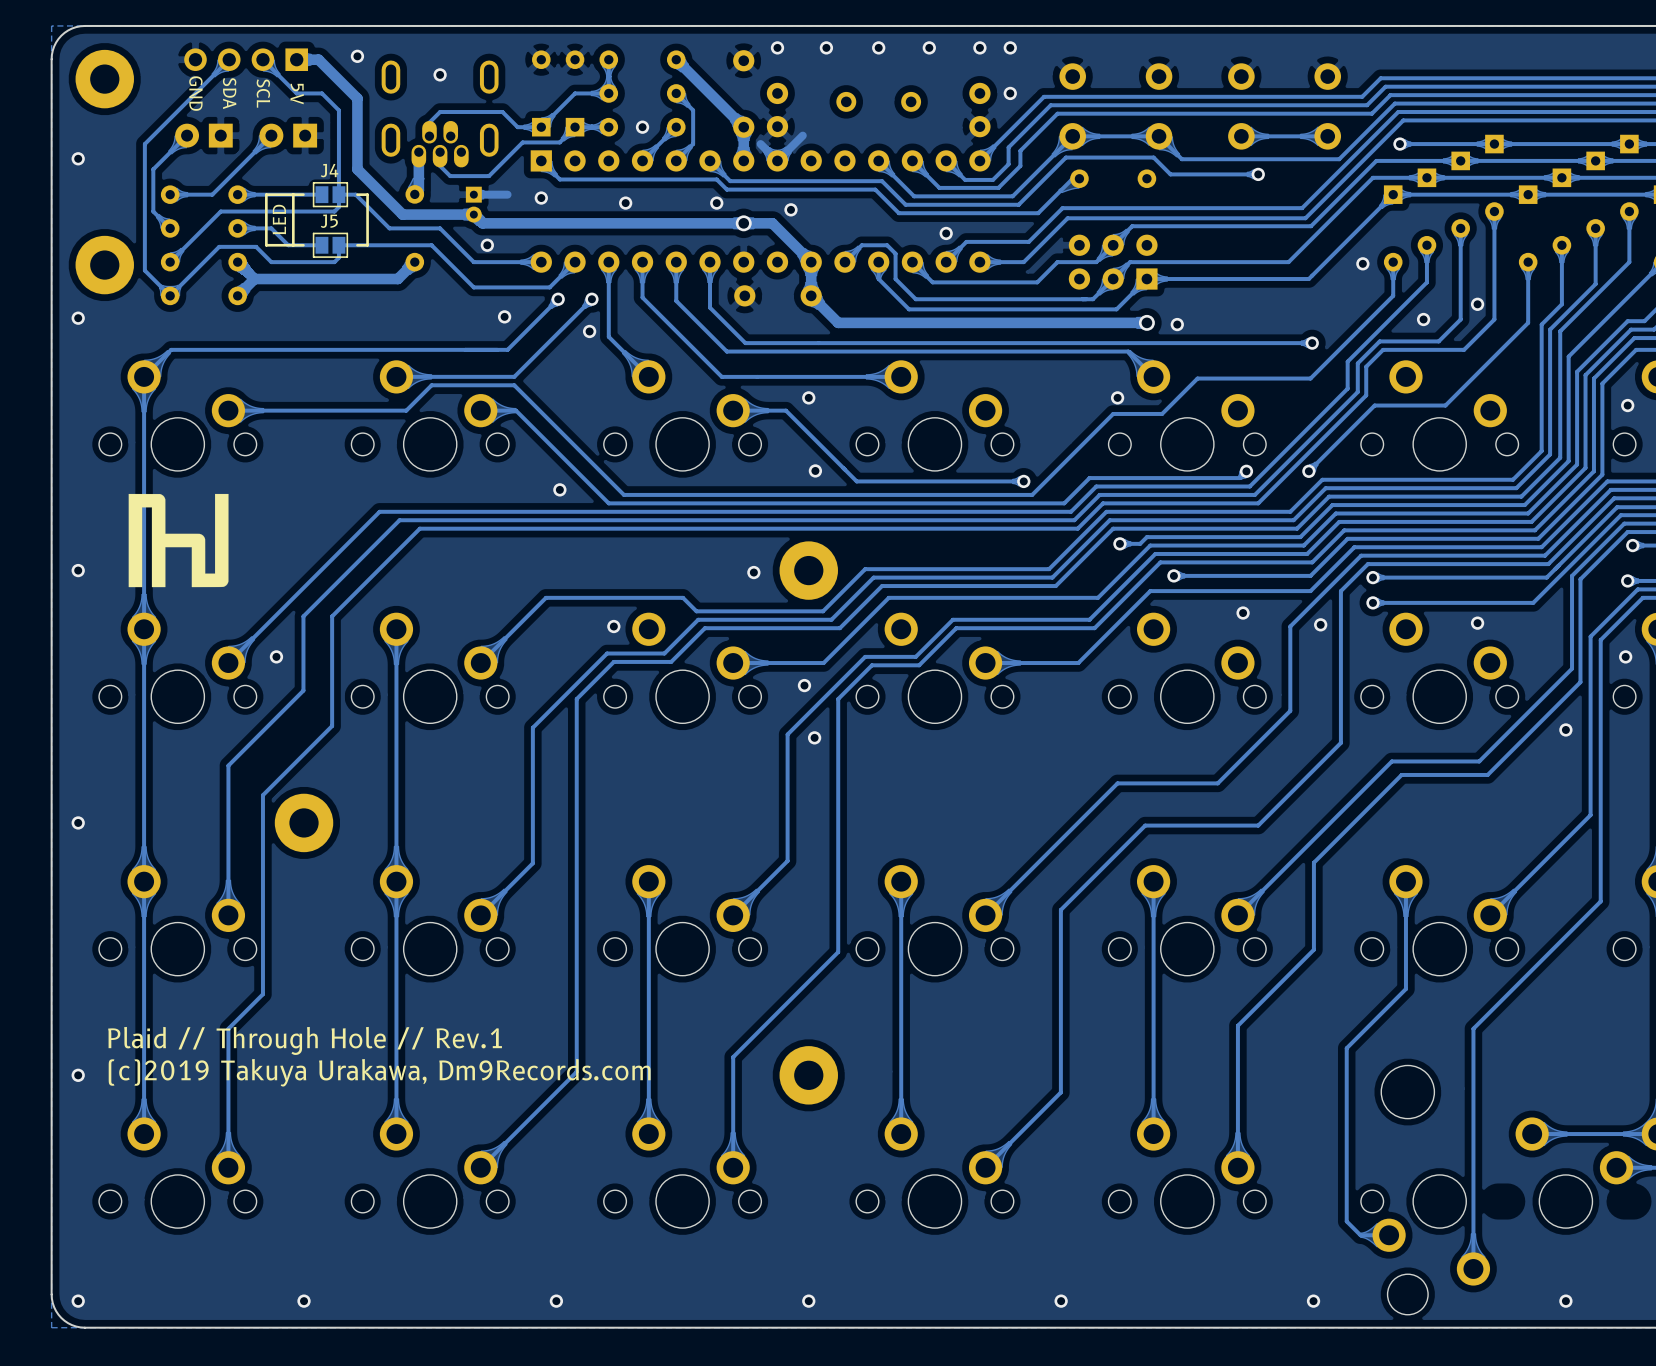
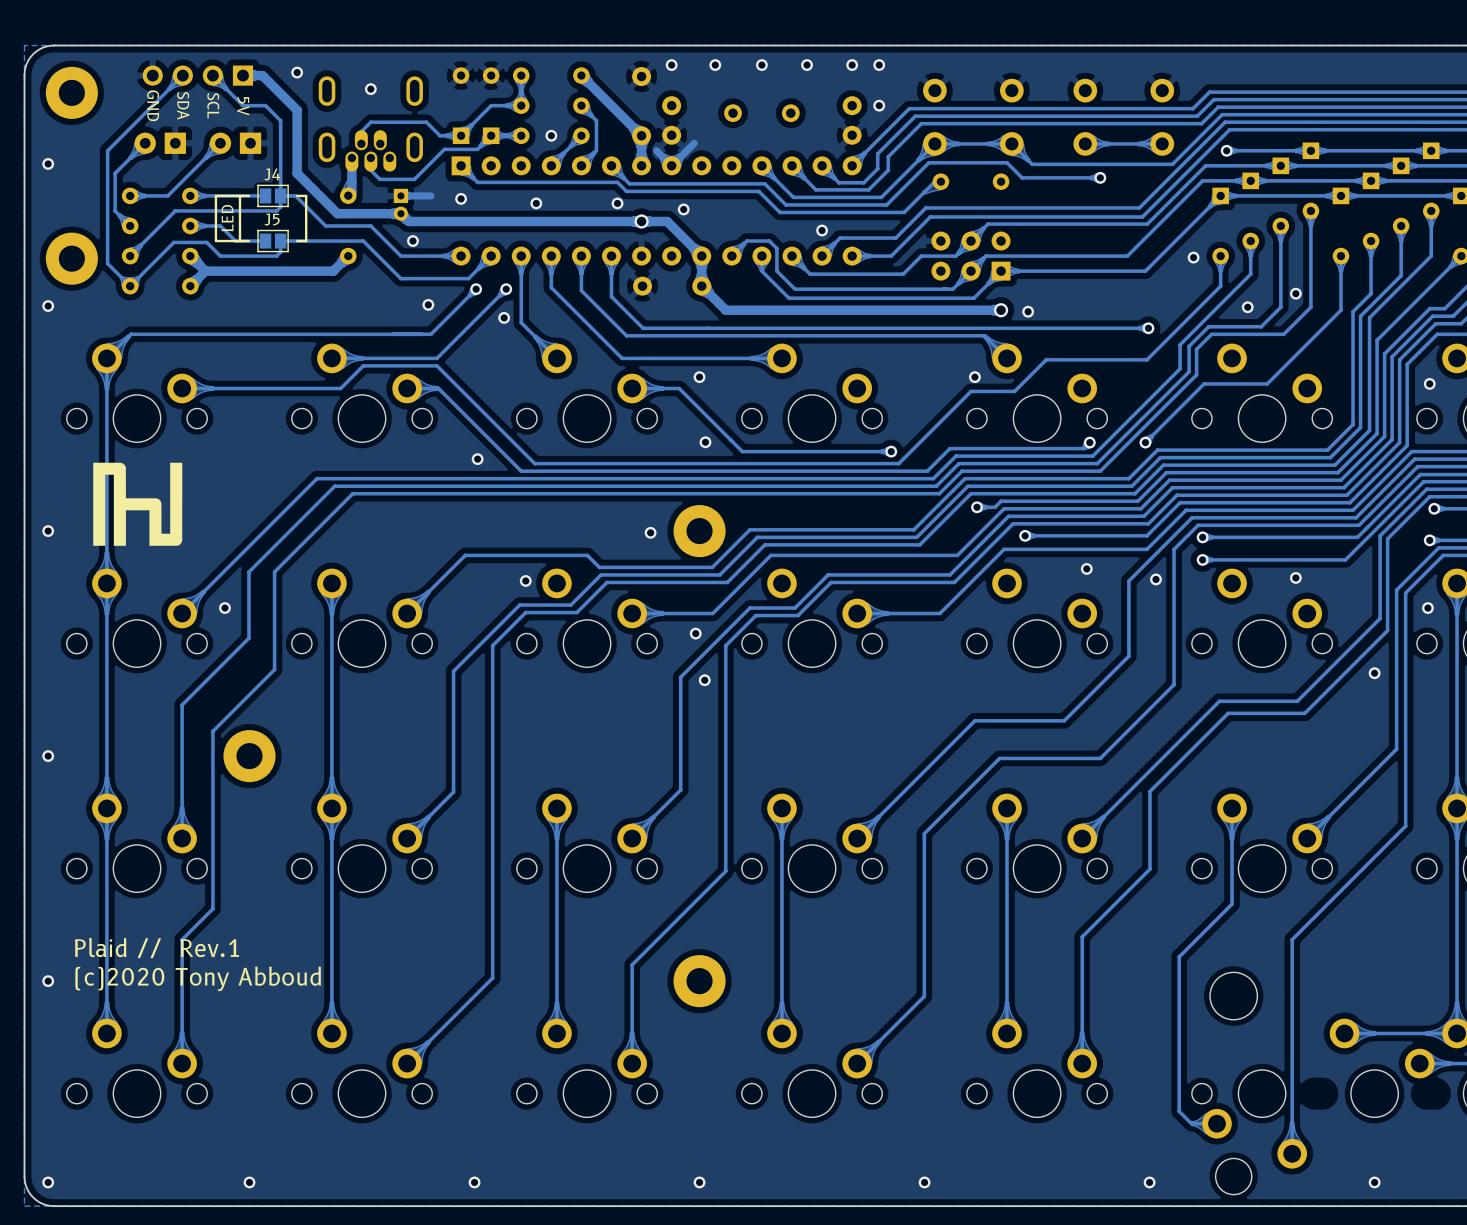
text: Plaid // Through Hole // Rev.1 (305, 1040) -> Plaid // Rev.1 (156, 948)
text: (c)2019 Takuya Urakawa, Dm9Records.com (379, 1072) -> (c)2020 Tony Abboud (198, 978)

